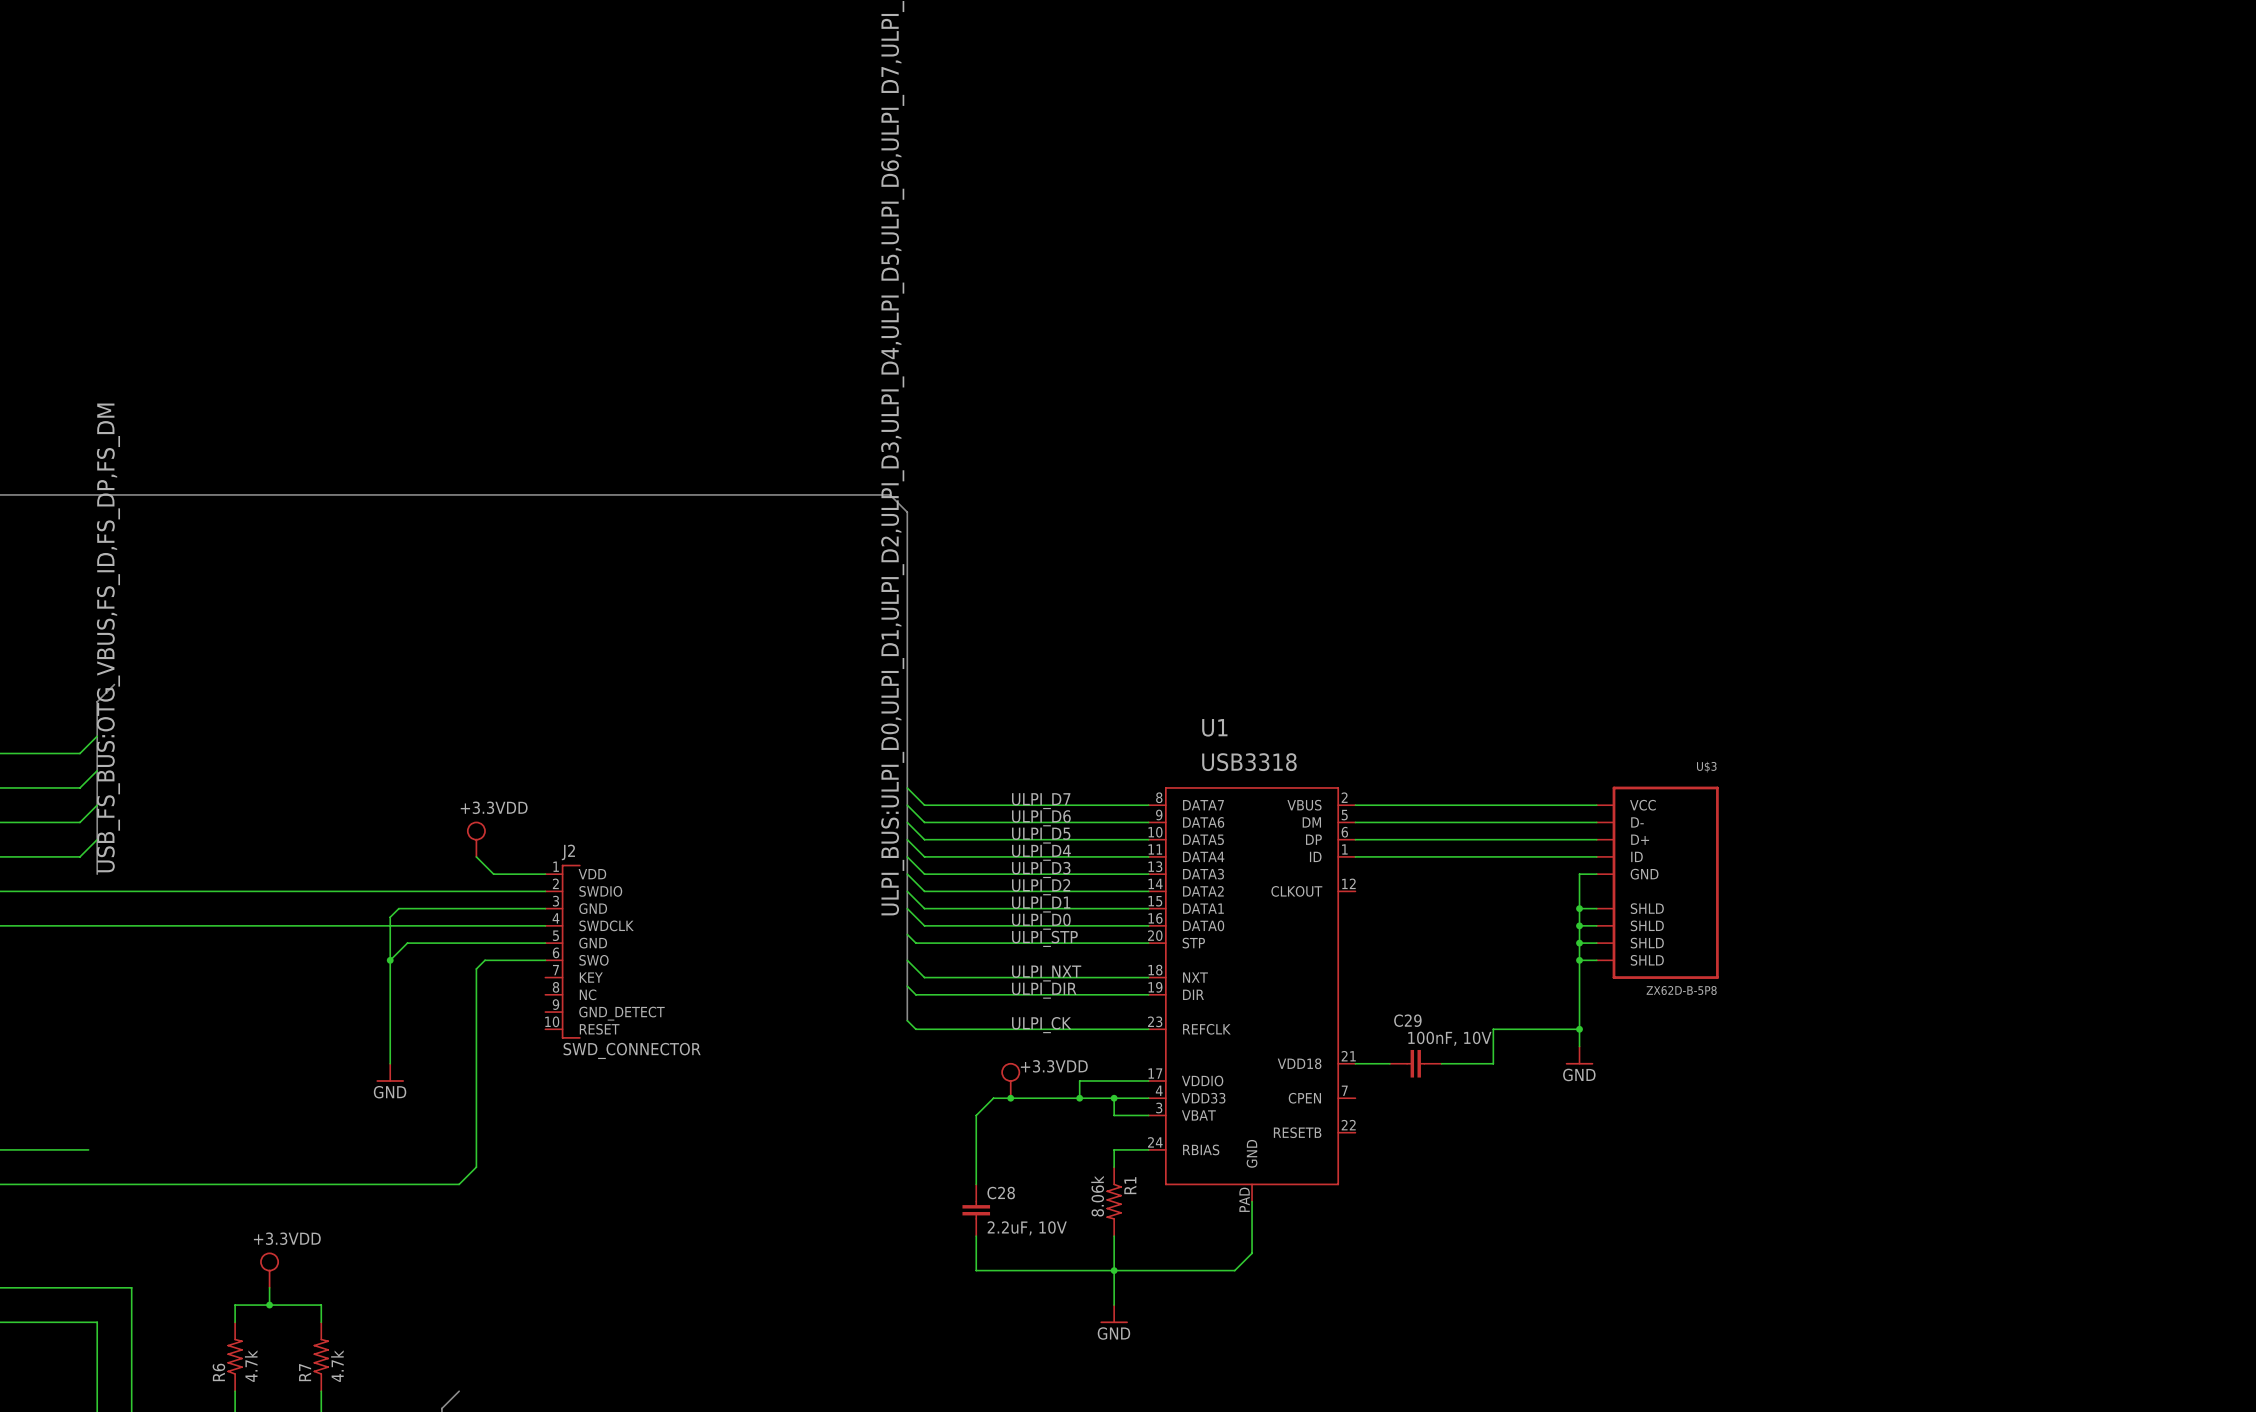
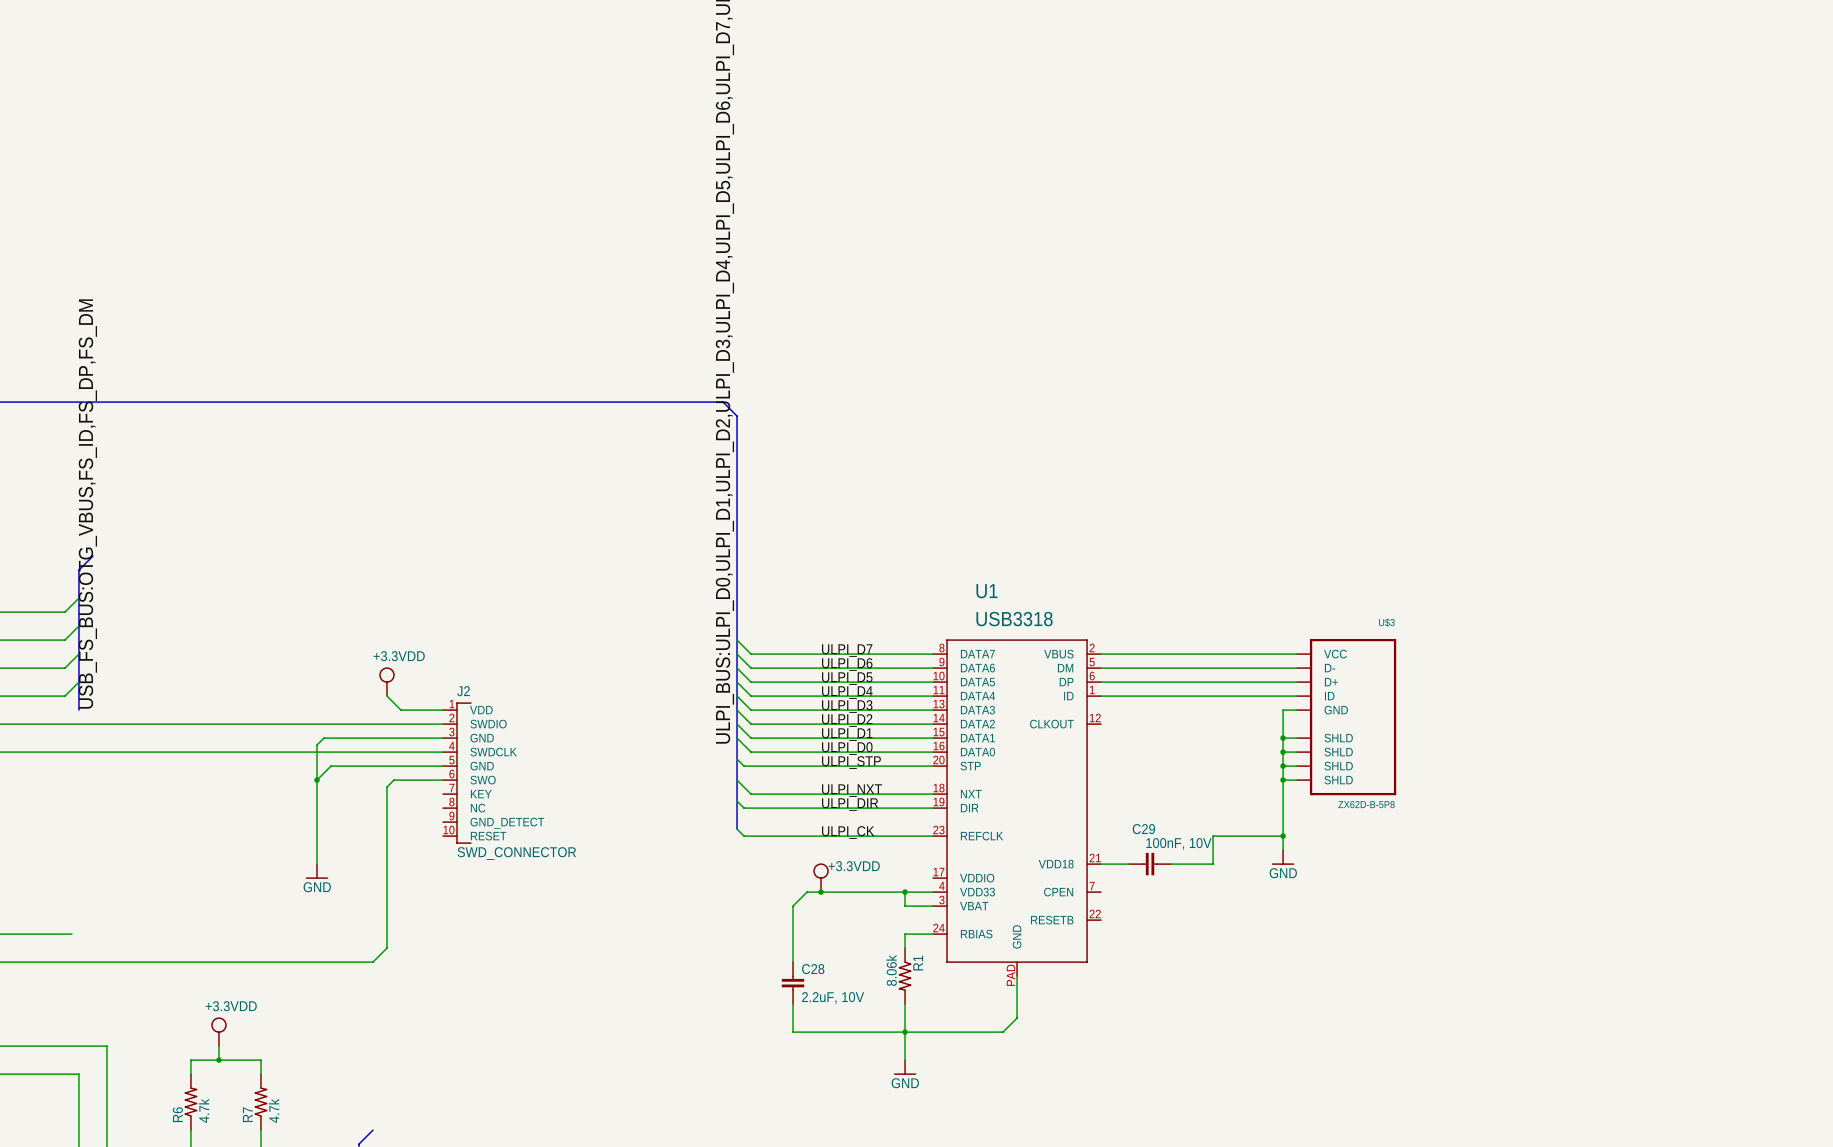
wire: (1148, 1080) (1079, 1080) (1079, 1098) -> none
junction: (1079, 1098) -> none

